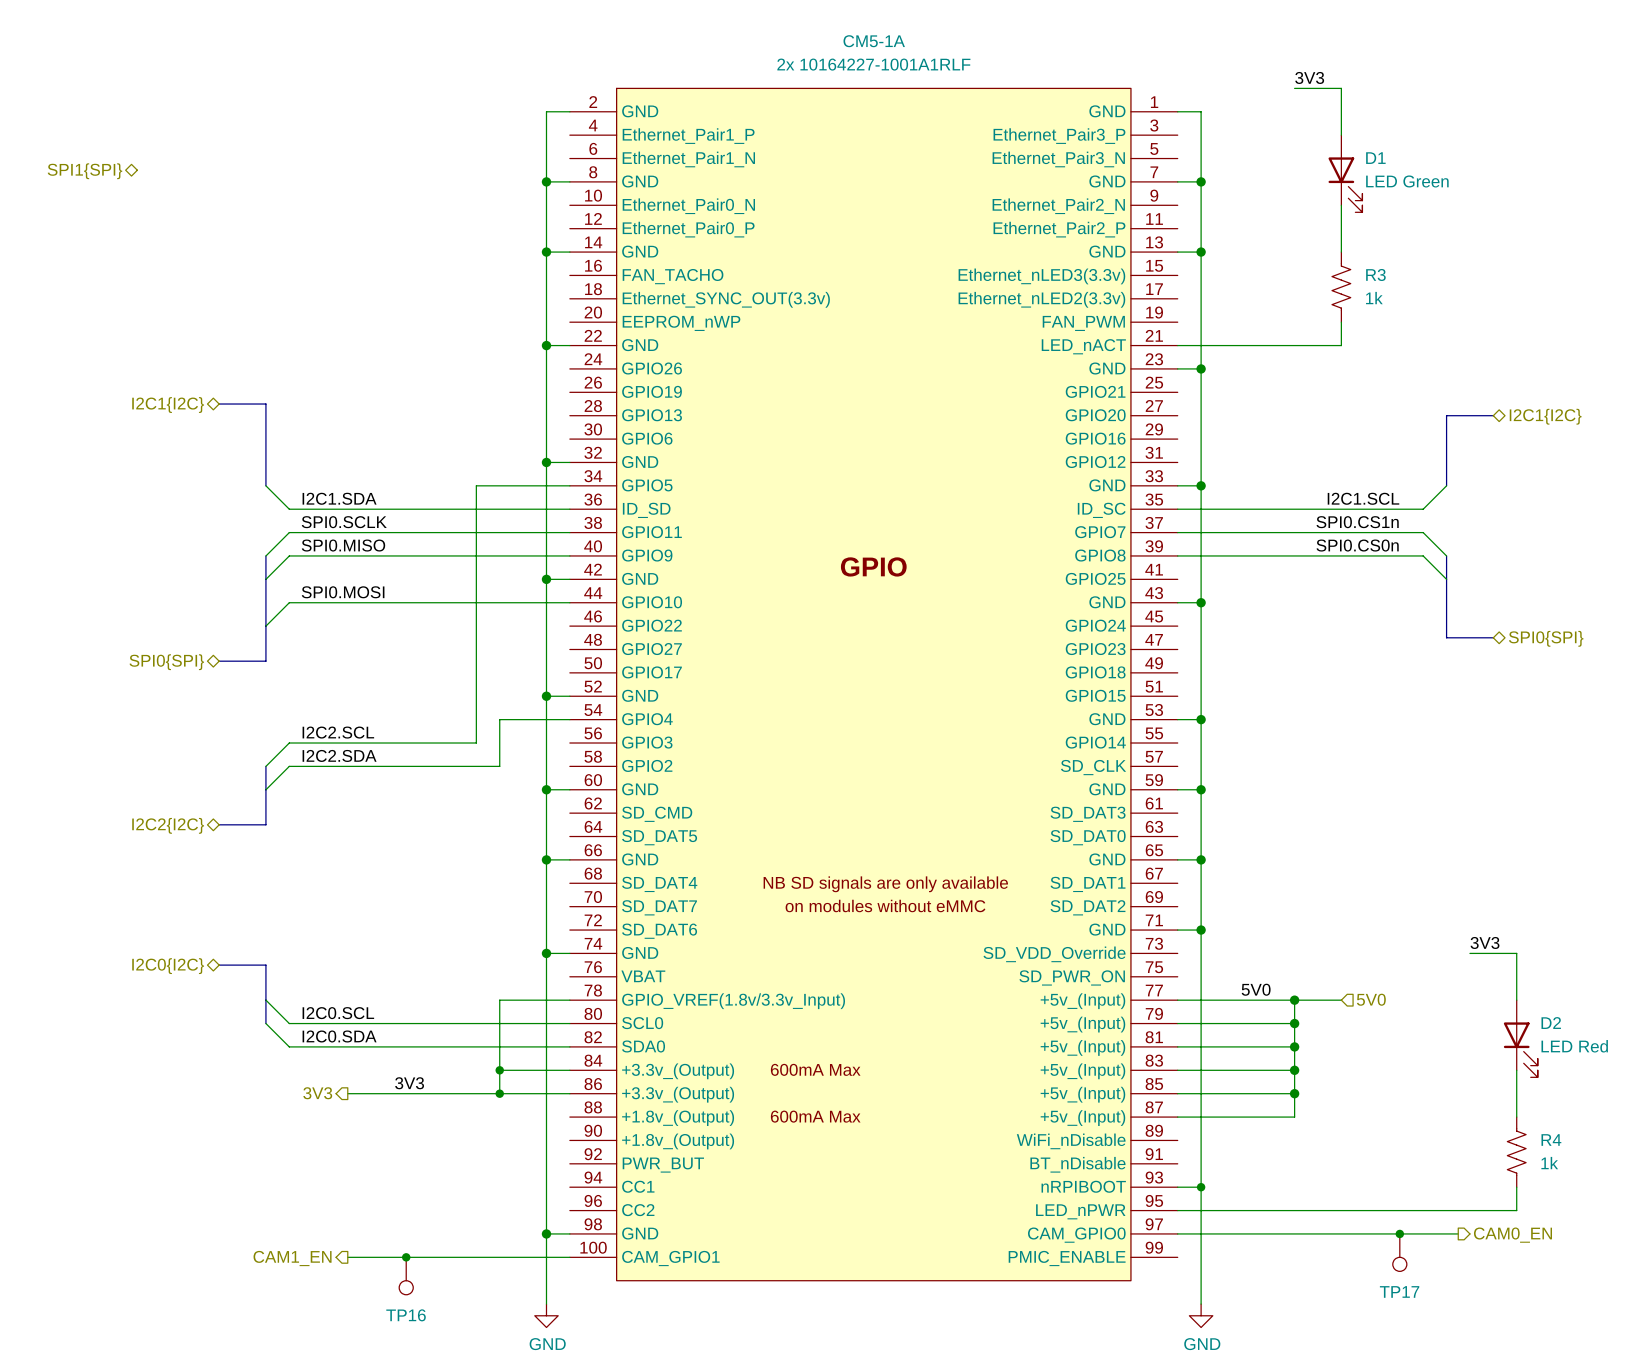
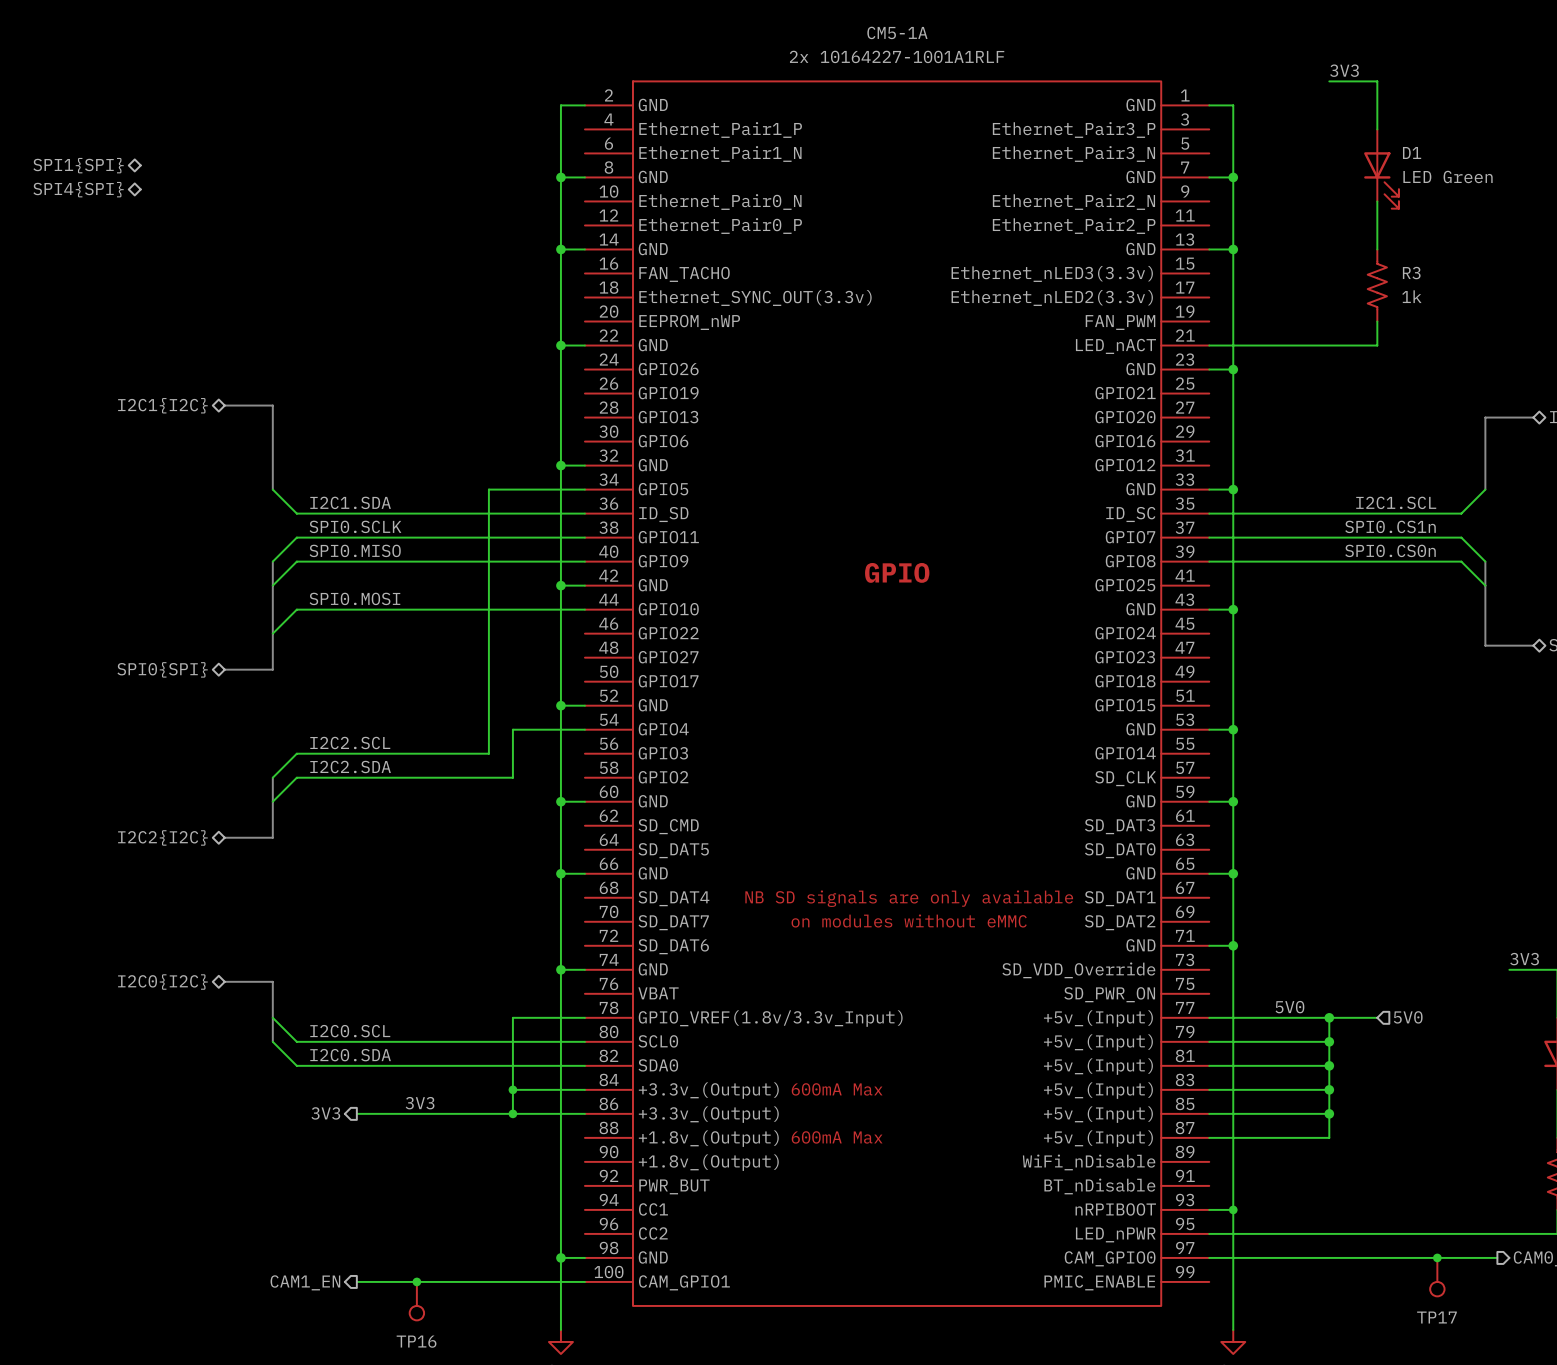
hierarchical label: none -> SPI4{SPI} (78, 189)

